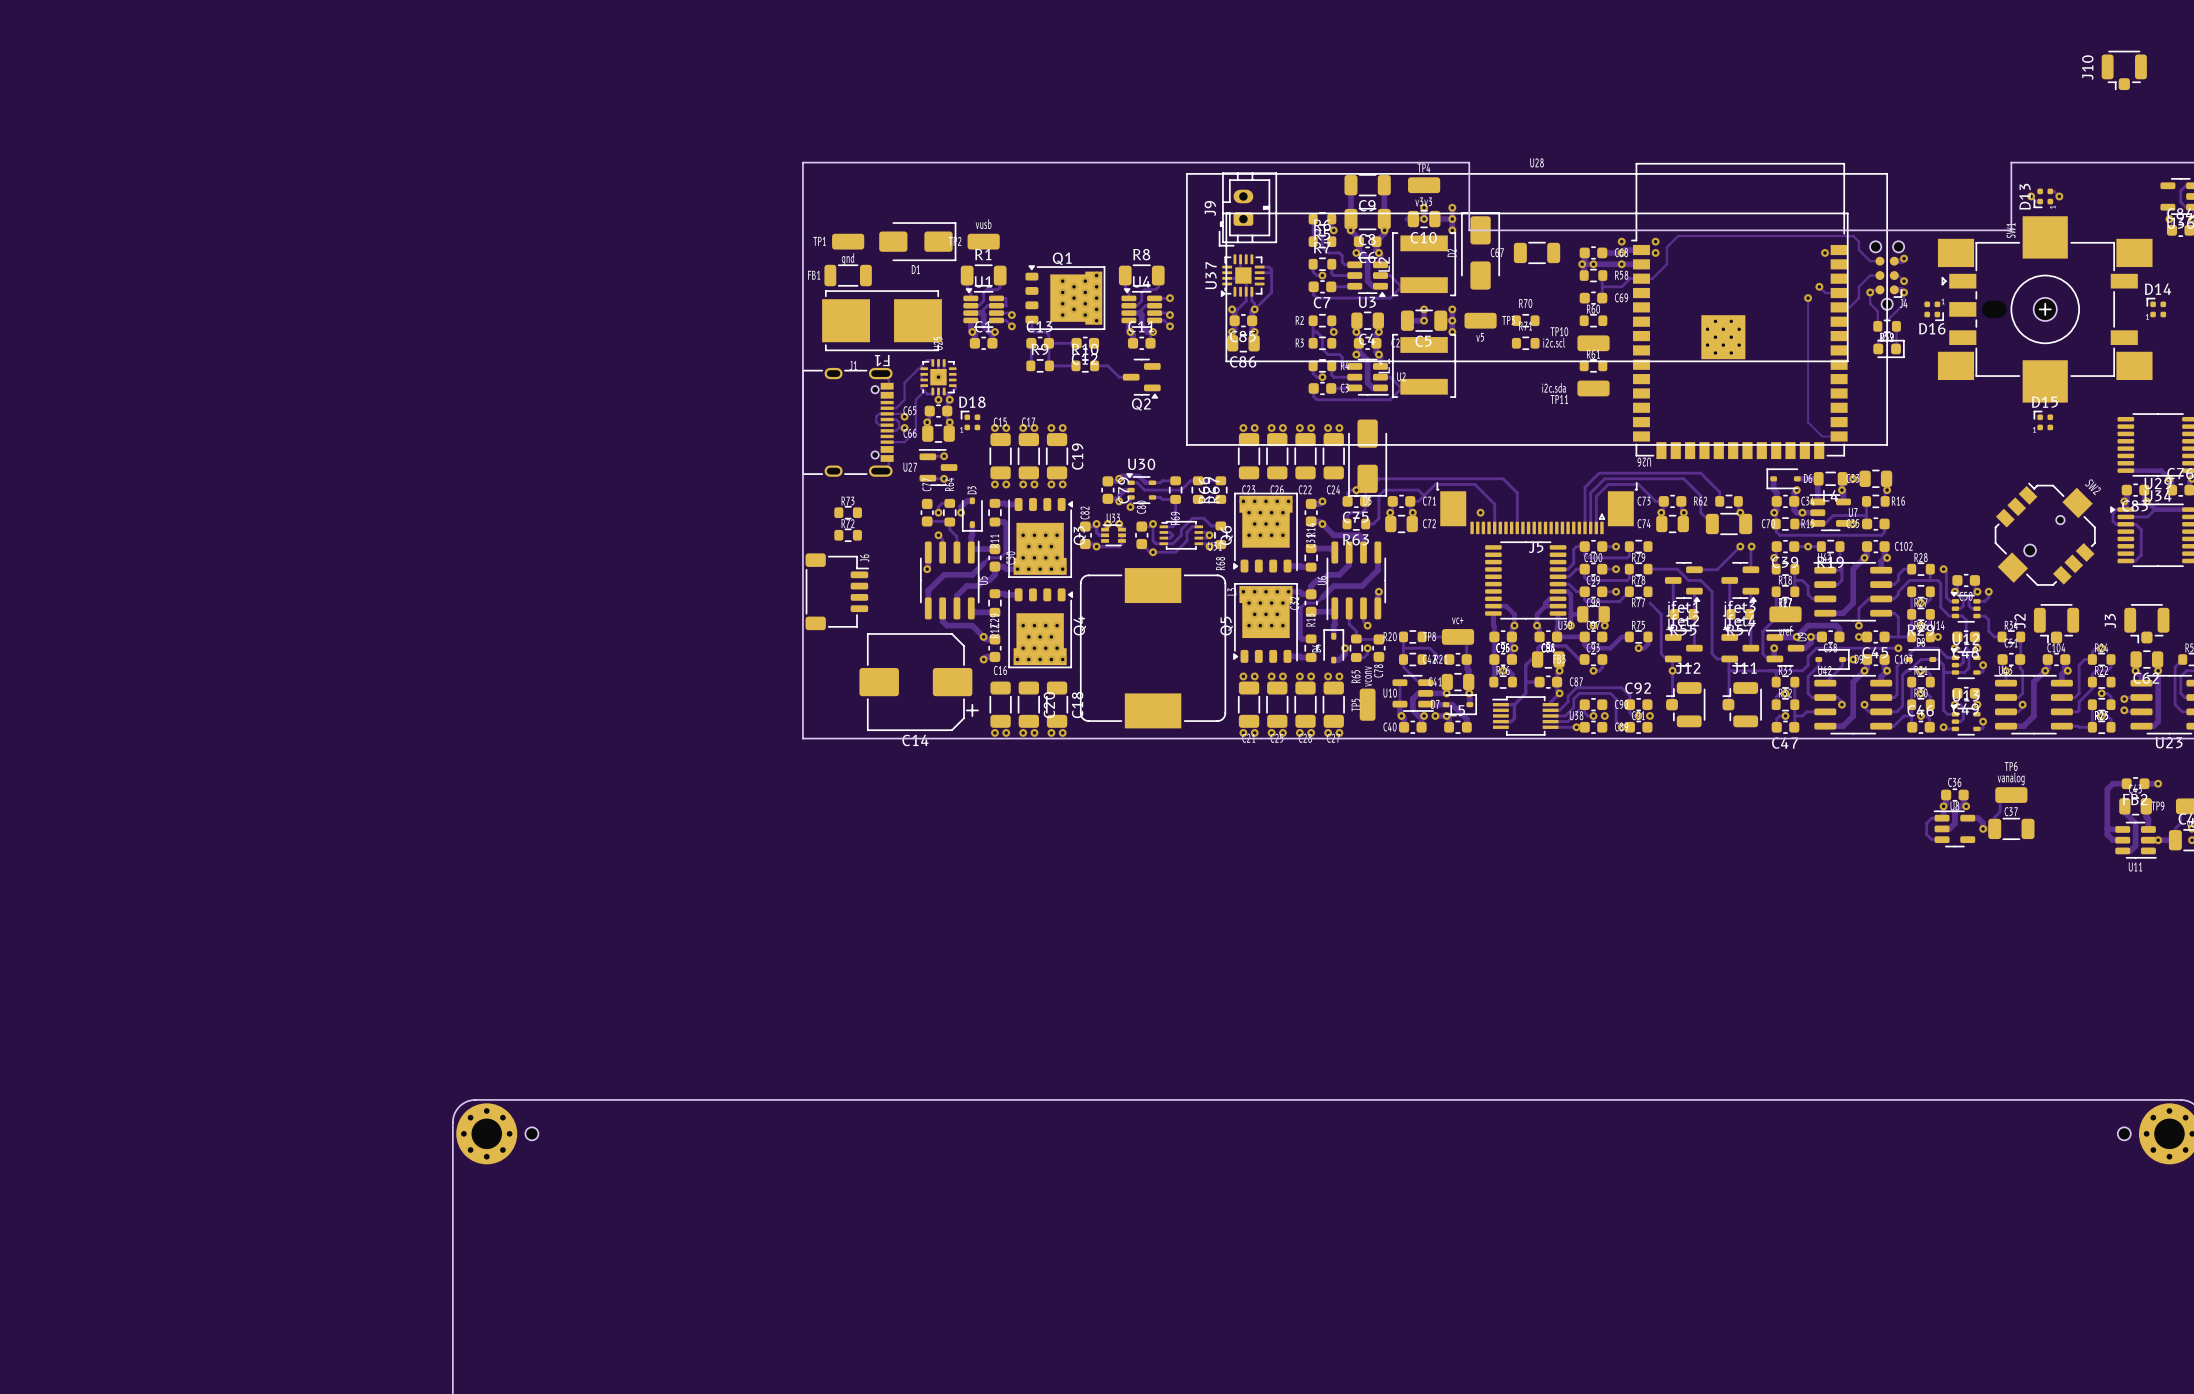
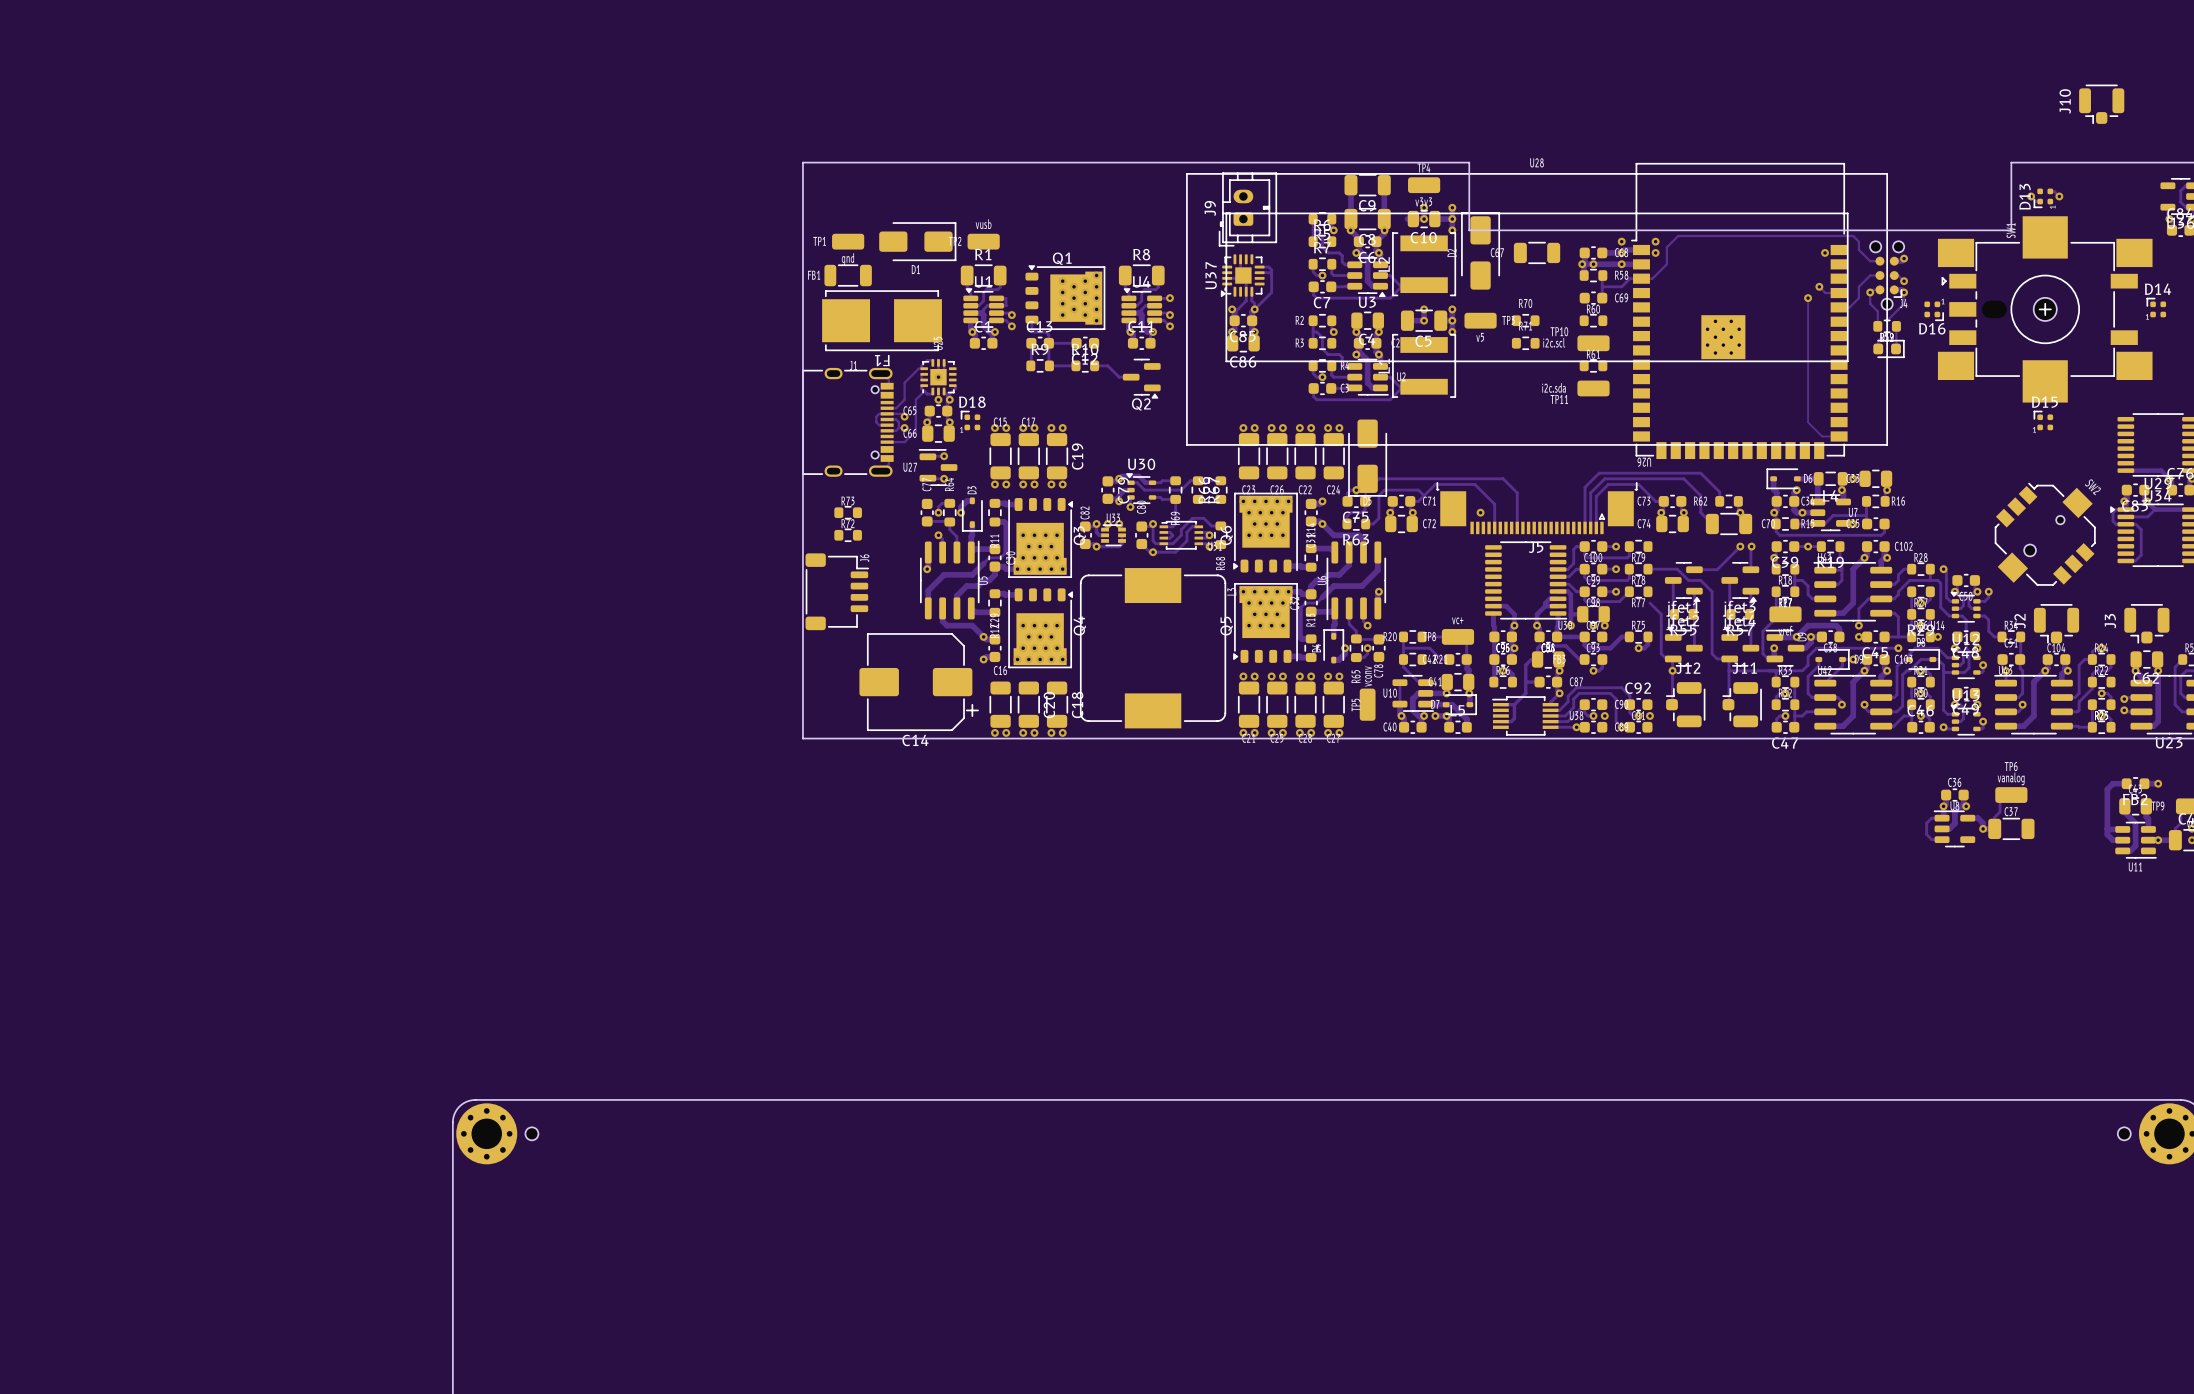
J10 position: (2124, 70) -> (2101, 104)

